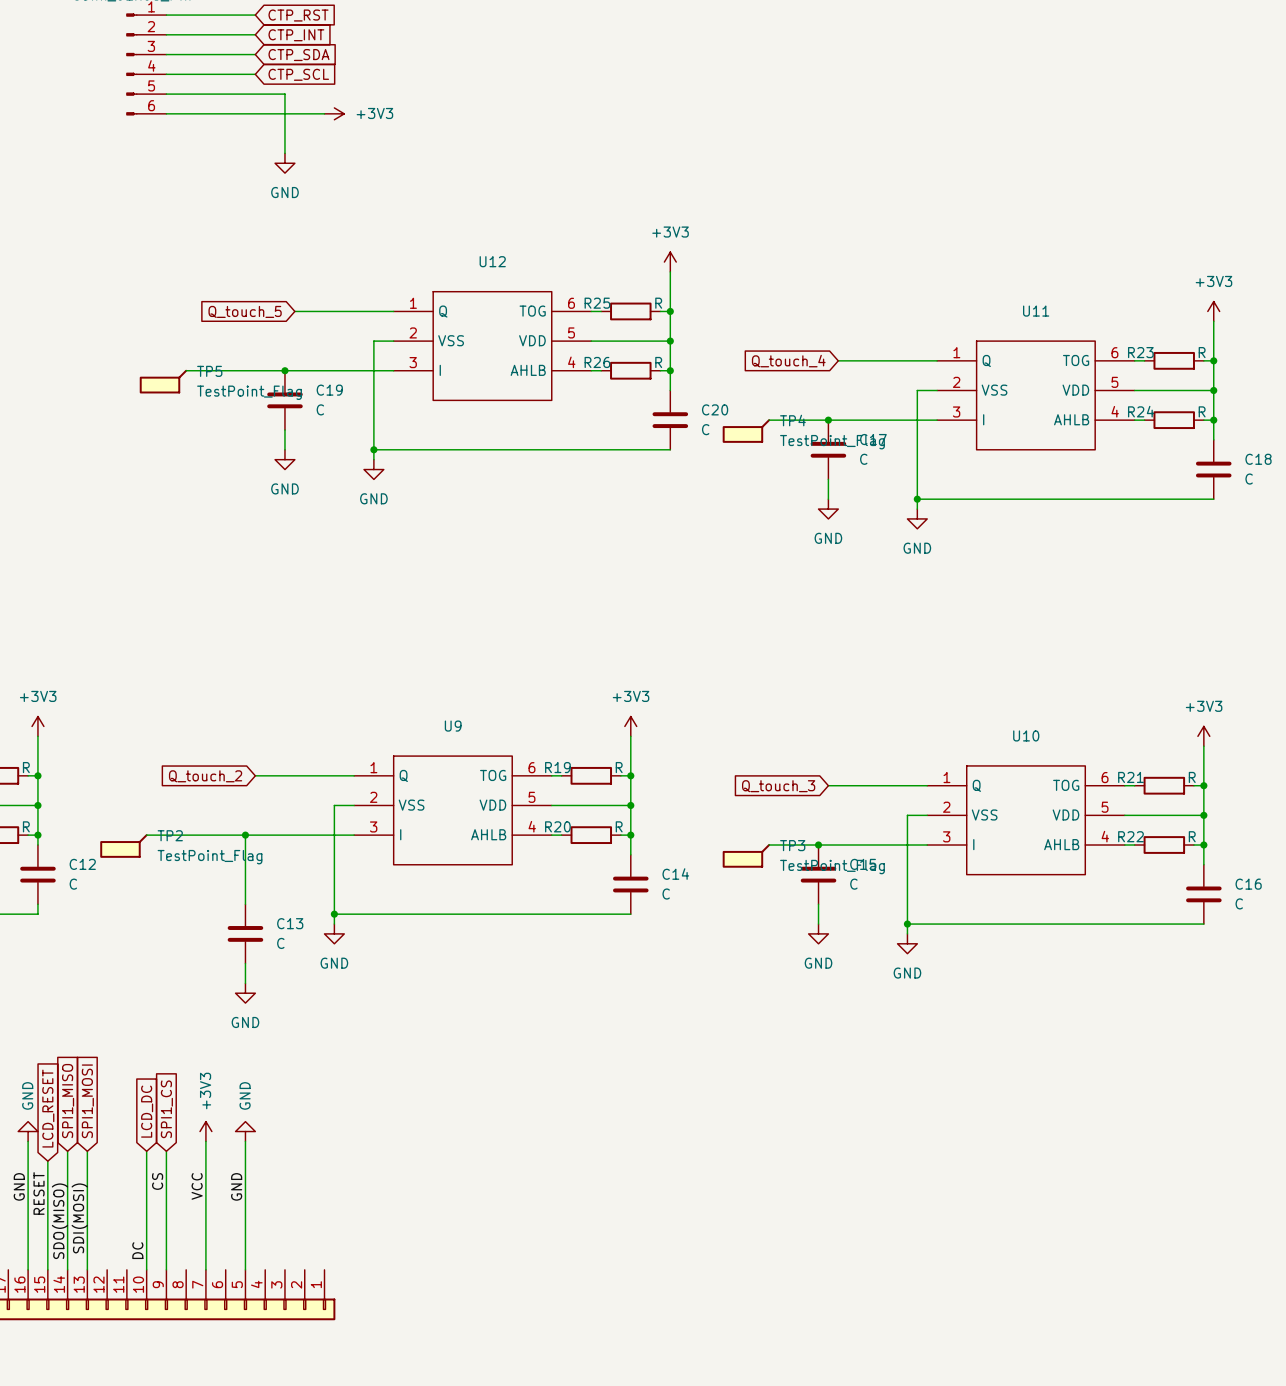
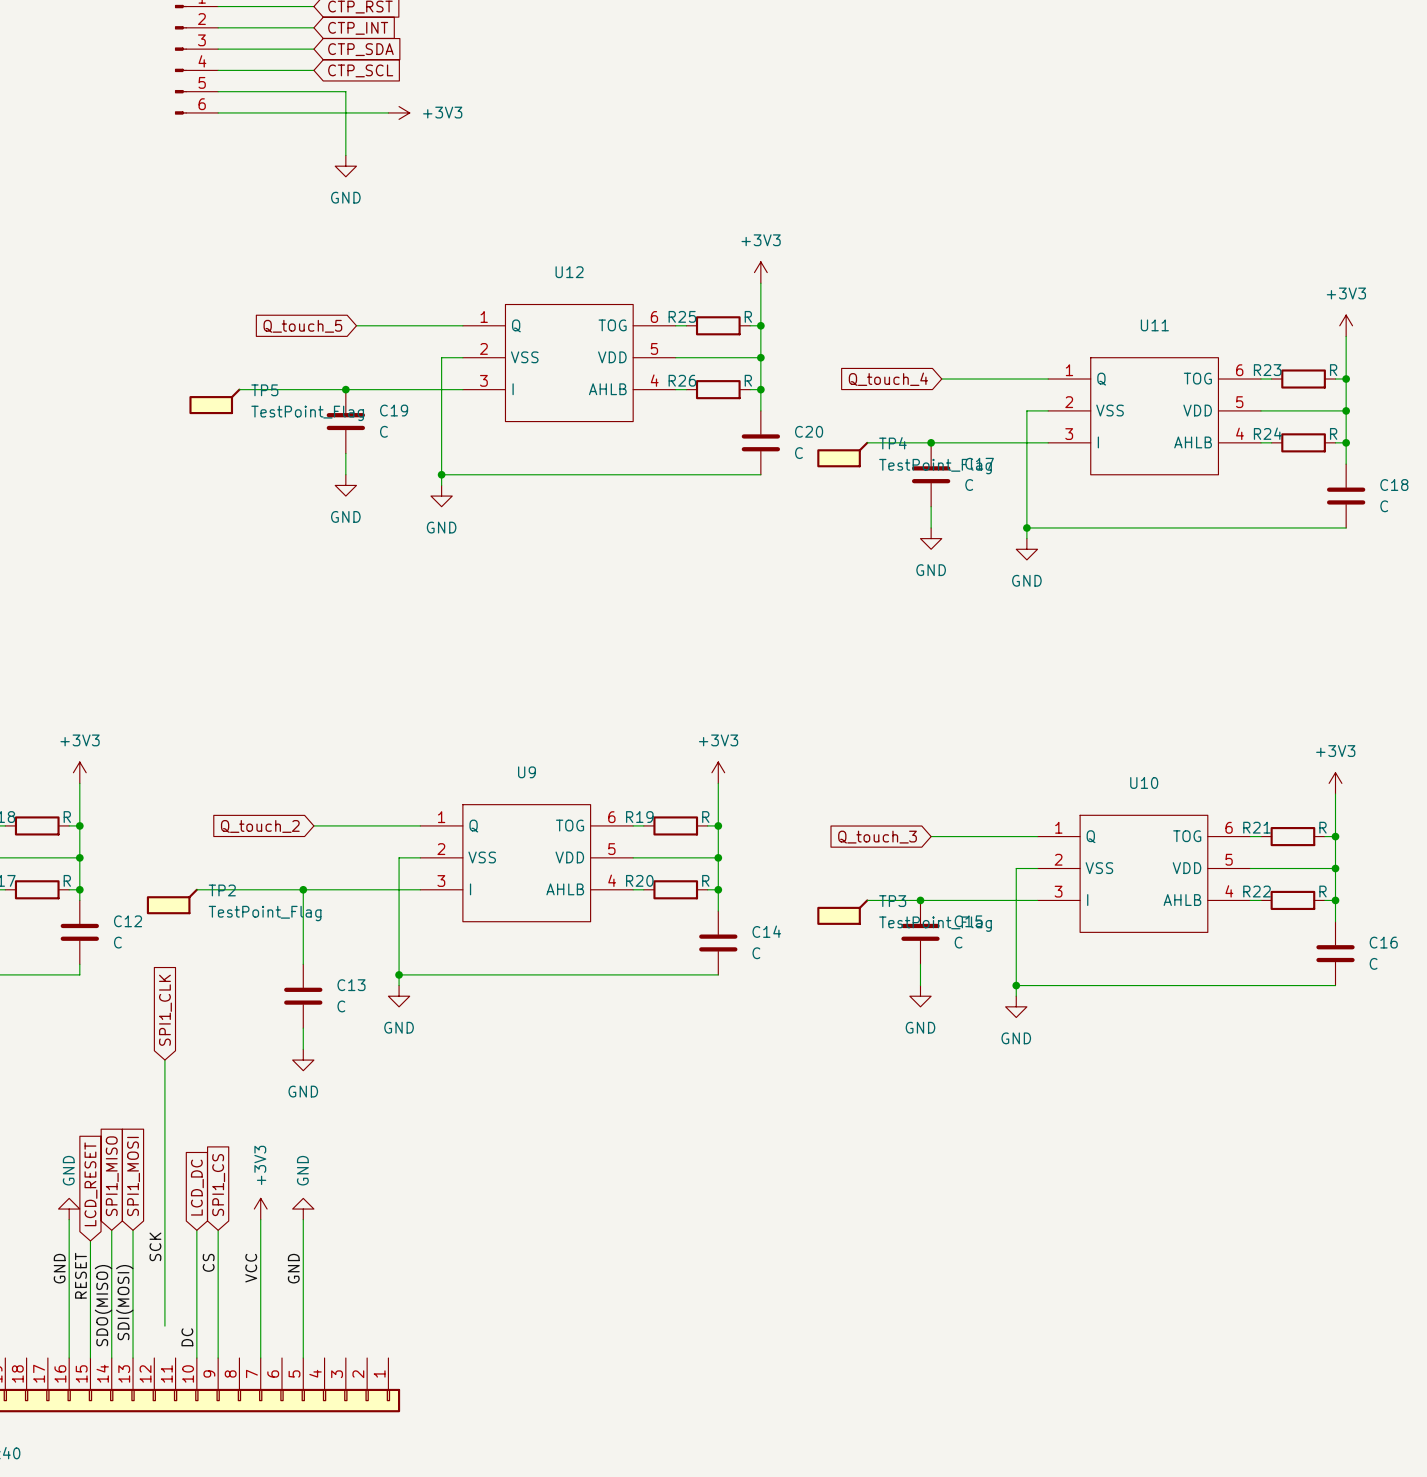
global label: none -> SPI1_CLK (165, 1010)
wire: none -> (164, 1060) (164, 1326)
label: none -> SCK (155, 1246)

